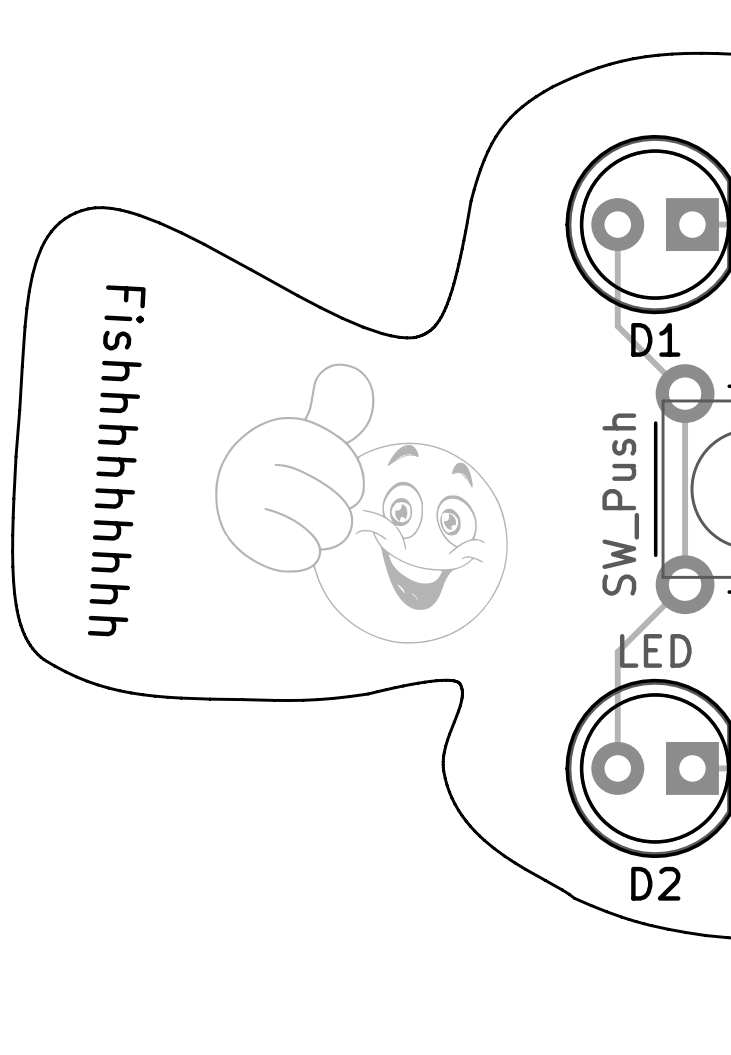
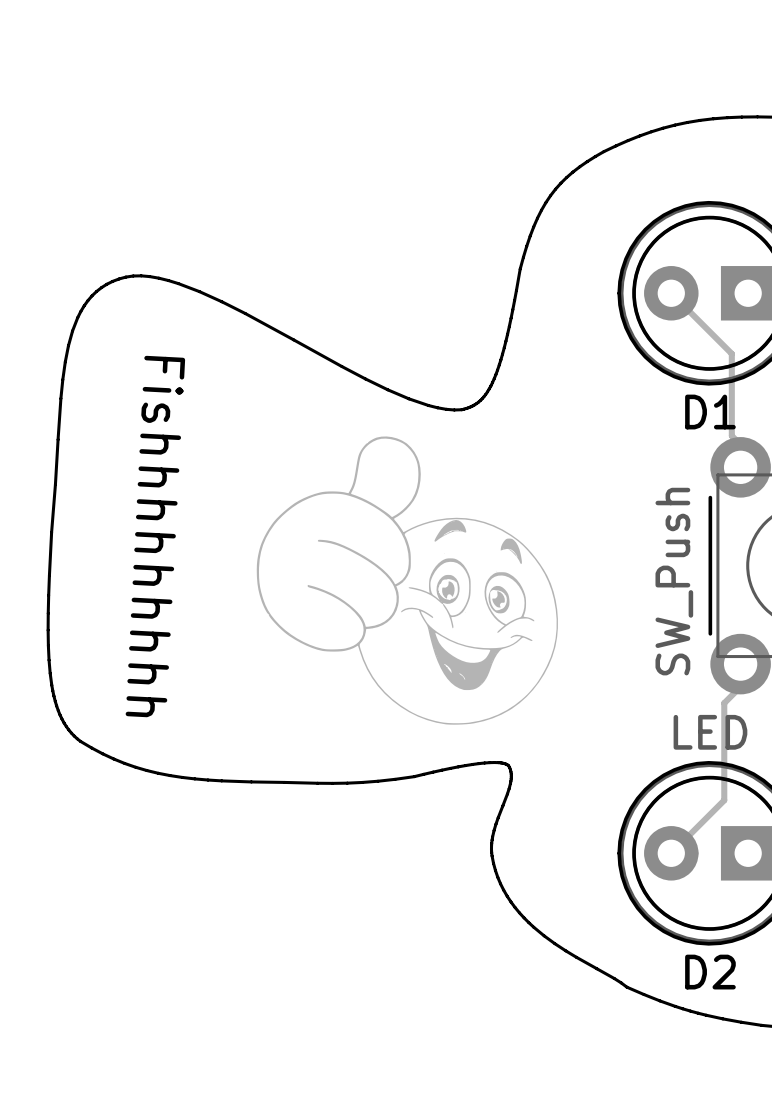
track: (617, 224) (617, 326) (685, 393) (685, 584) (617, 652) (617, 768) -> (740, 664) (740, 686) (724, 703) (724, 800) (671, 853)
track: none -> (671, 293) (731, 353) (731, 435) (740, 444) (740, 467)

